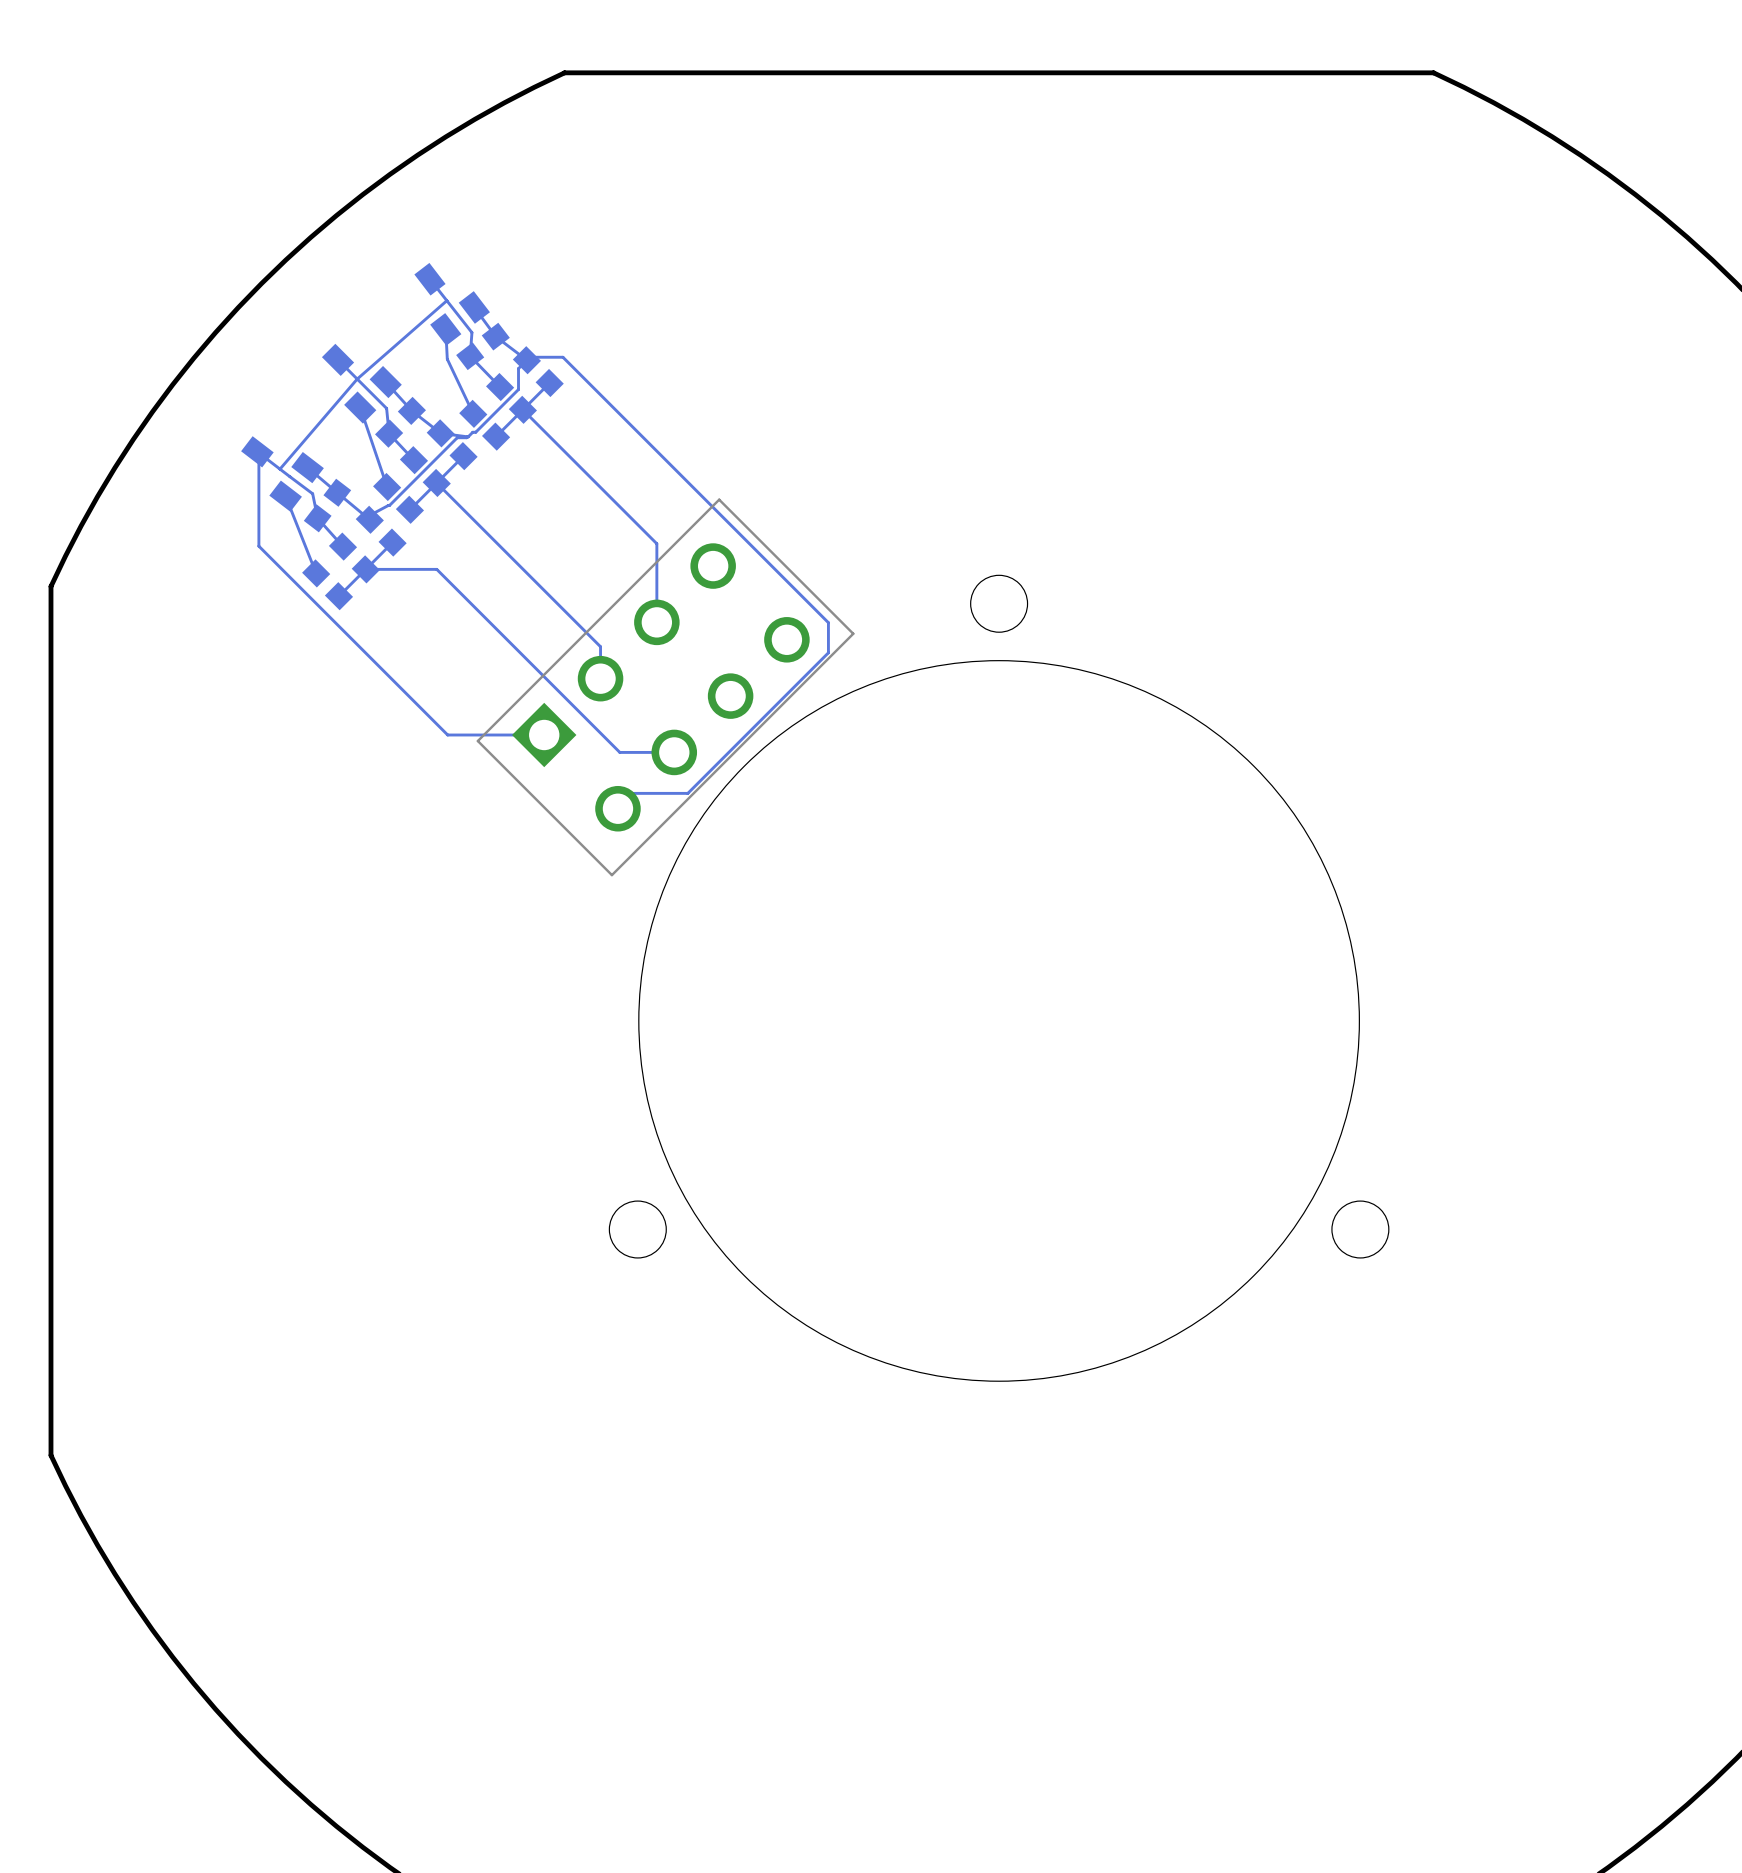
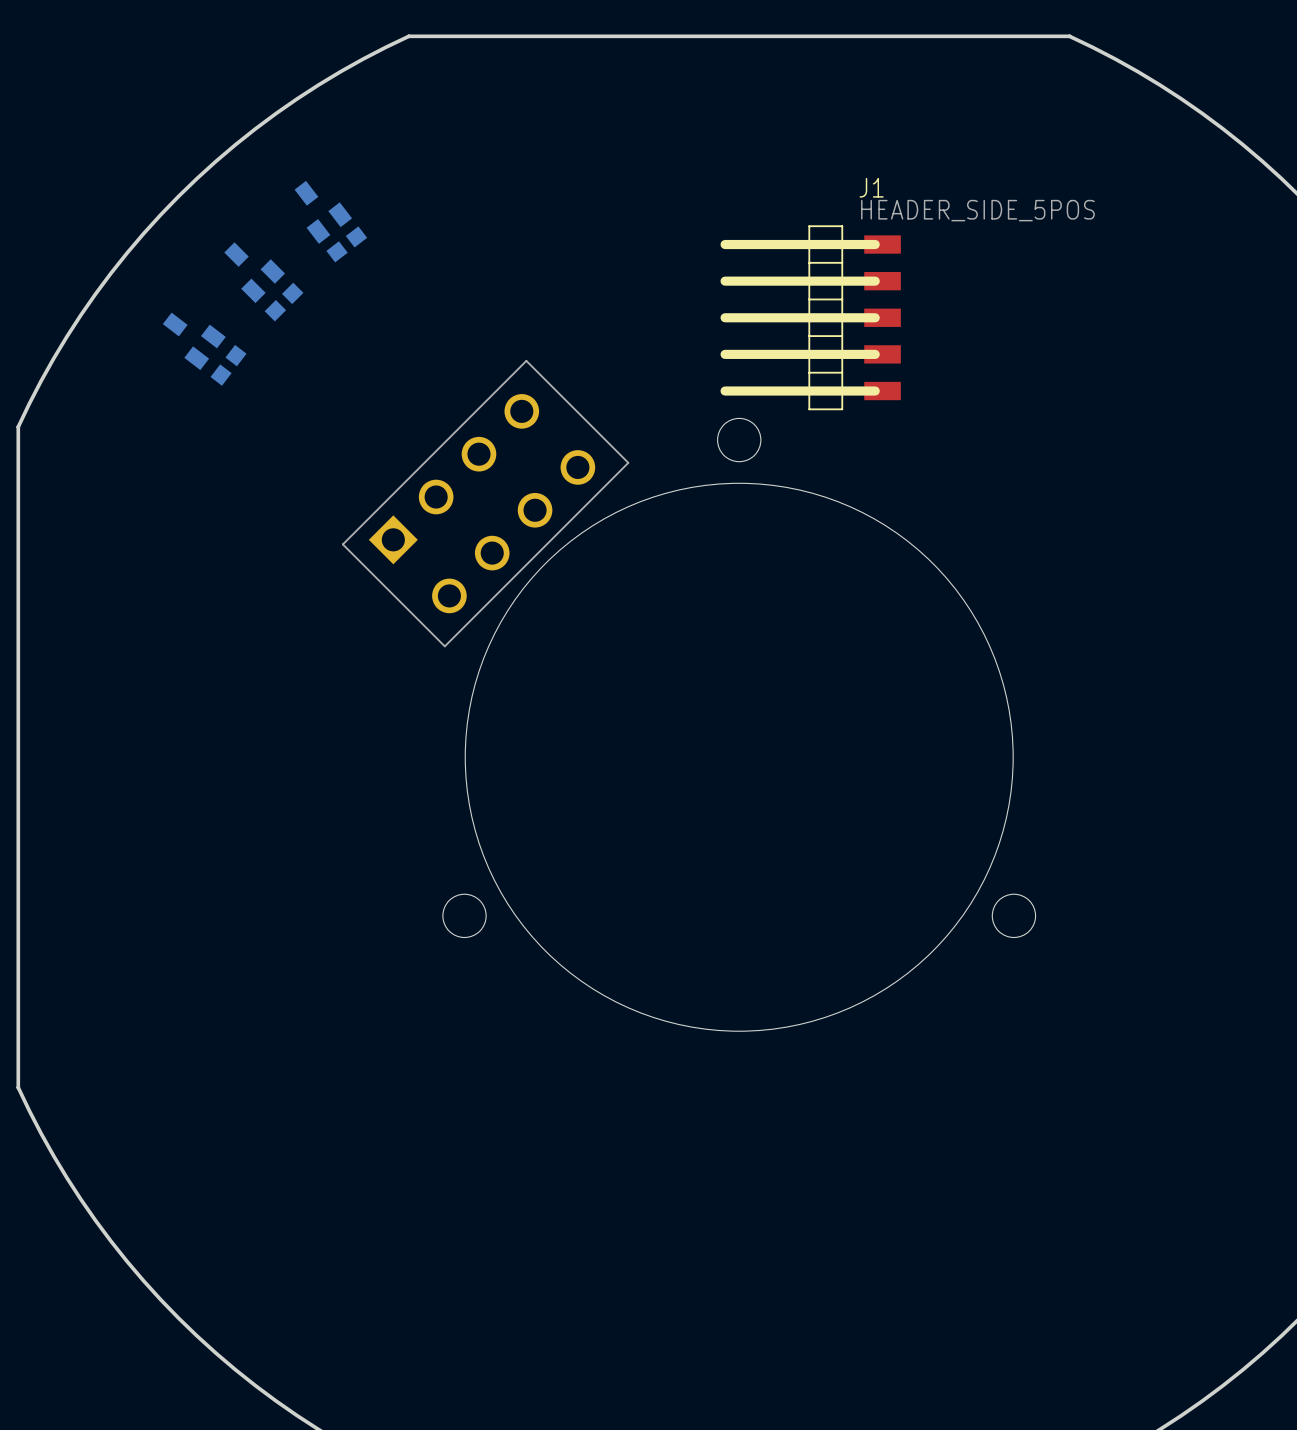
bottom track: (429, 279) (471, 332) (470, 356) (500, 387) -> none
bottom track: (446, 300) (357, 379) (280, 469) -> none
bottom track: (474, 307) (495, 336) (526, 360) -> none
bottom track: (445, 329) (447, 359) (473, 413) -> none
bottom track: (338, 359) (386, 408) (389, 433) (413, 460) -> none
part: (538, 371) -> none
bottom track: (385, 382) (411, 410) (440, 433) (468, 436) (472, 432) (475, 432) (518, 389) (518, 368) (529, 357) (562, 357) (828, 622) (828, 652) (687, 793) (633, 793) (617, 808) -> none
bottom track: (549, 383) (496, 436) -> none
part: (511, 398) -> none
bottom track: (360, 407) (387, 486) -> none
bottom track: (522, 409) (656, 543) (656, 622) -> none
part: (484, 425) -> none
bottom track: (467, 436) (457, 437) (389, 505) (366, 517) -> none
J1: none -> HEADER_SIDE_5POS (810, 317)
part: (452, 444) -> none
bottom track: (257, 451) (312, 493) (317, 518) (342, 546) -> none
bottom track: (258, 452) (258, 546) (447, 735) (544, 735) -> none
bottom track: (463, 456) (409, 509) -> none
bottom track: (307, 467) (366, 517) -> none
part: (425, 471) -> none
bottom track: (436, 482) (600, 646) (600, 678) -> none
bottom track: (285, 496) (316, 573) -> none
part: (398, 498) -> none
part: (381, 531) -> none
bottom track: (392, 542) (338, 596) -> none
part: (354, 557) -> none
bottom track: (365, 569) (436, 569) (619, 752) (674, 752) -> none
part: (327, 584) -> none

